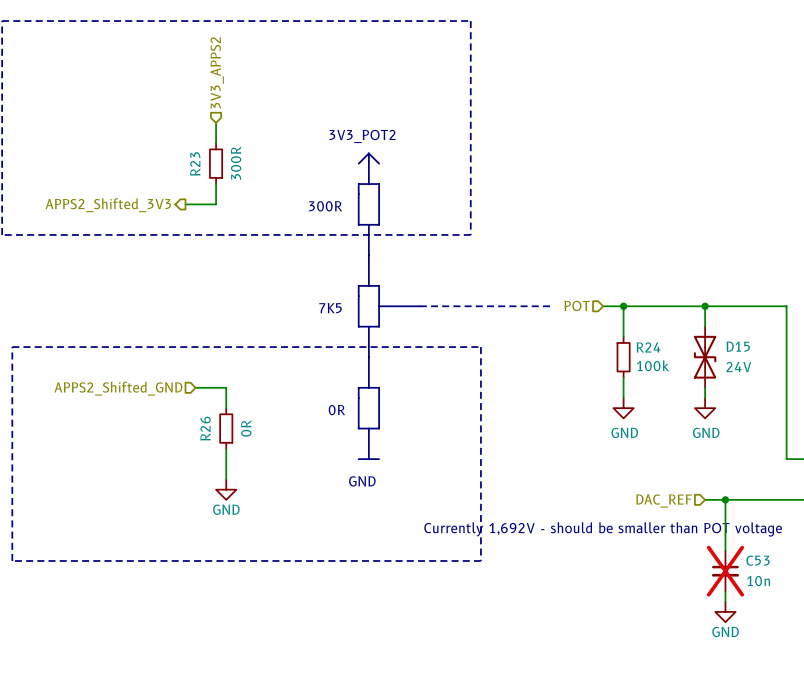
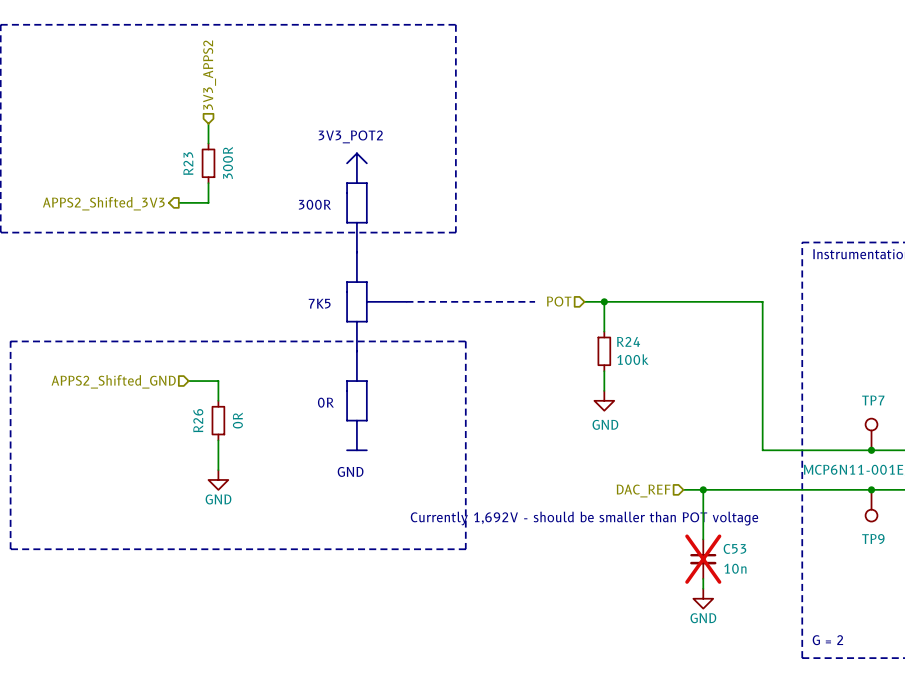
wire: (705, 306) (705, 326) -> none
junction: (705, 306) -> none
D15: 24V (705, 357) -> none
wire: (705, 387) (705, 397) -> none
power symbol: GND (705, 408) -> none

